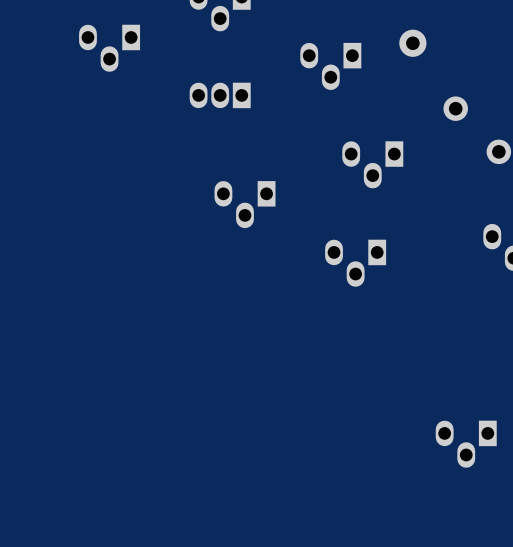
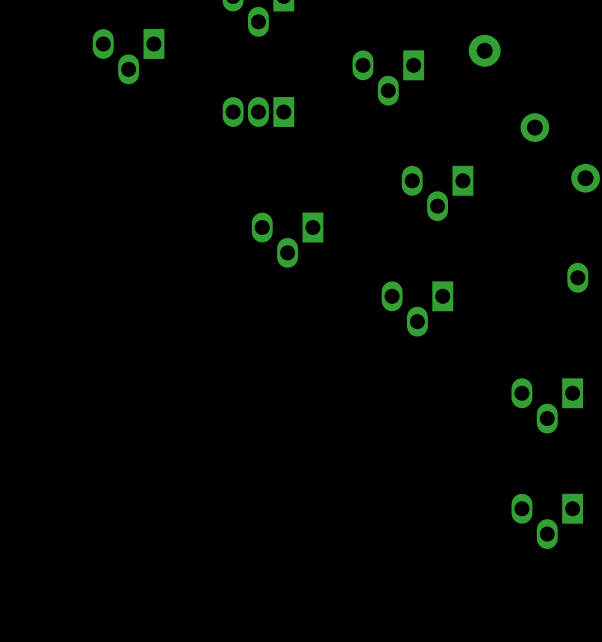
part: none -> (547, 405)

